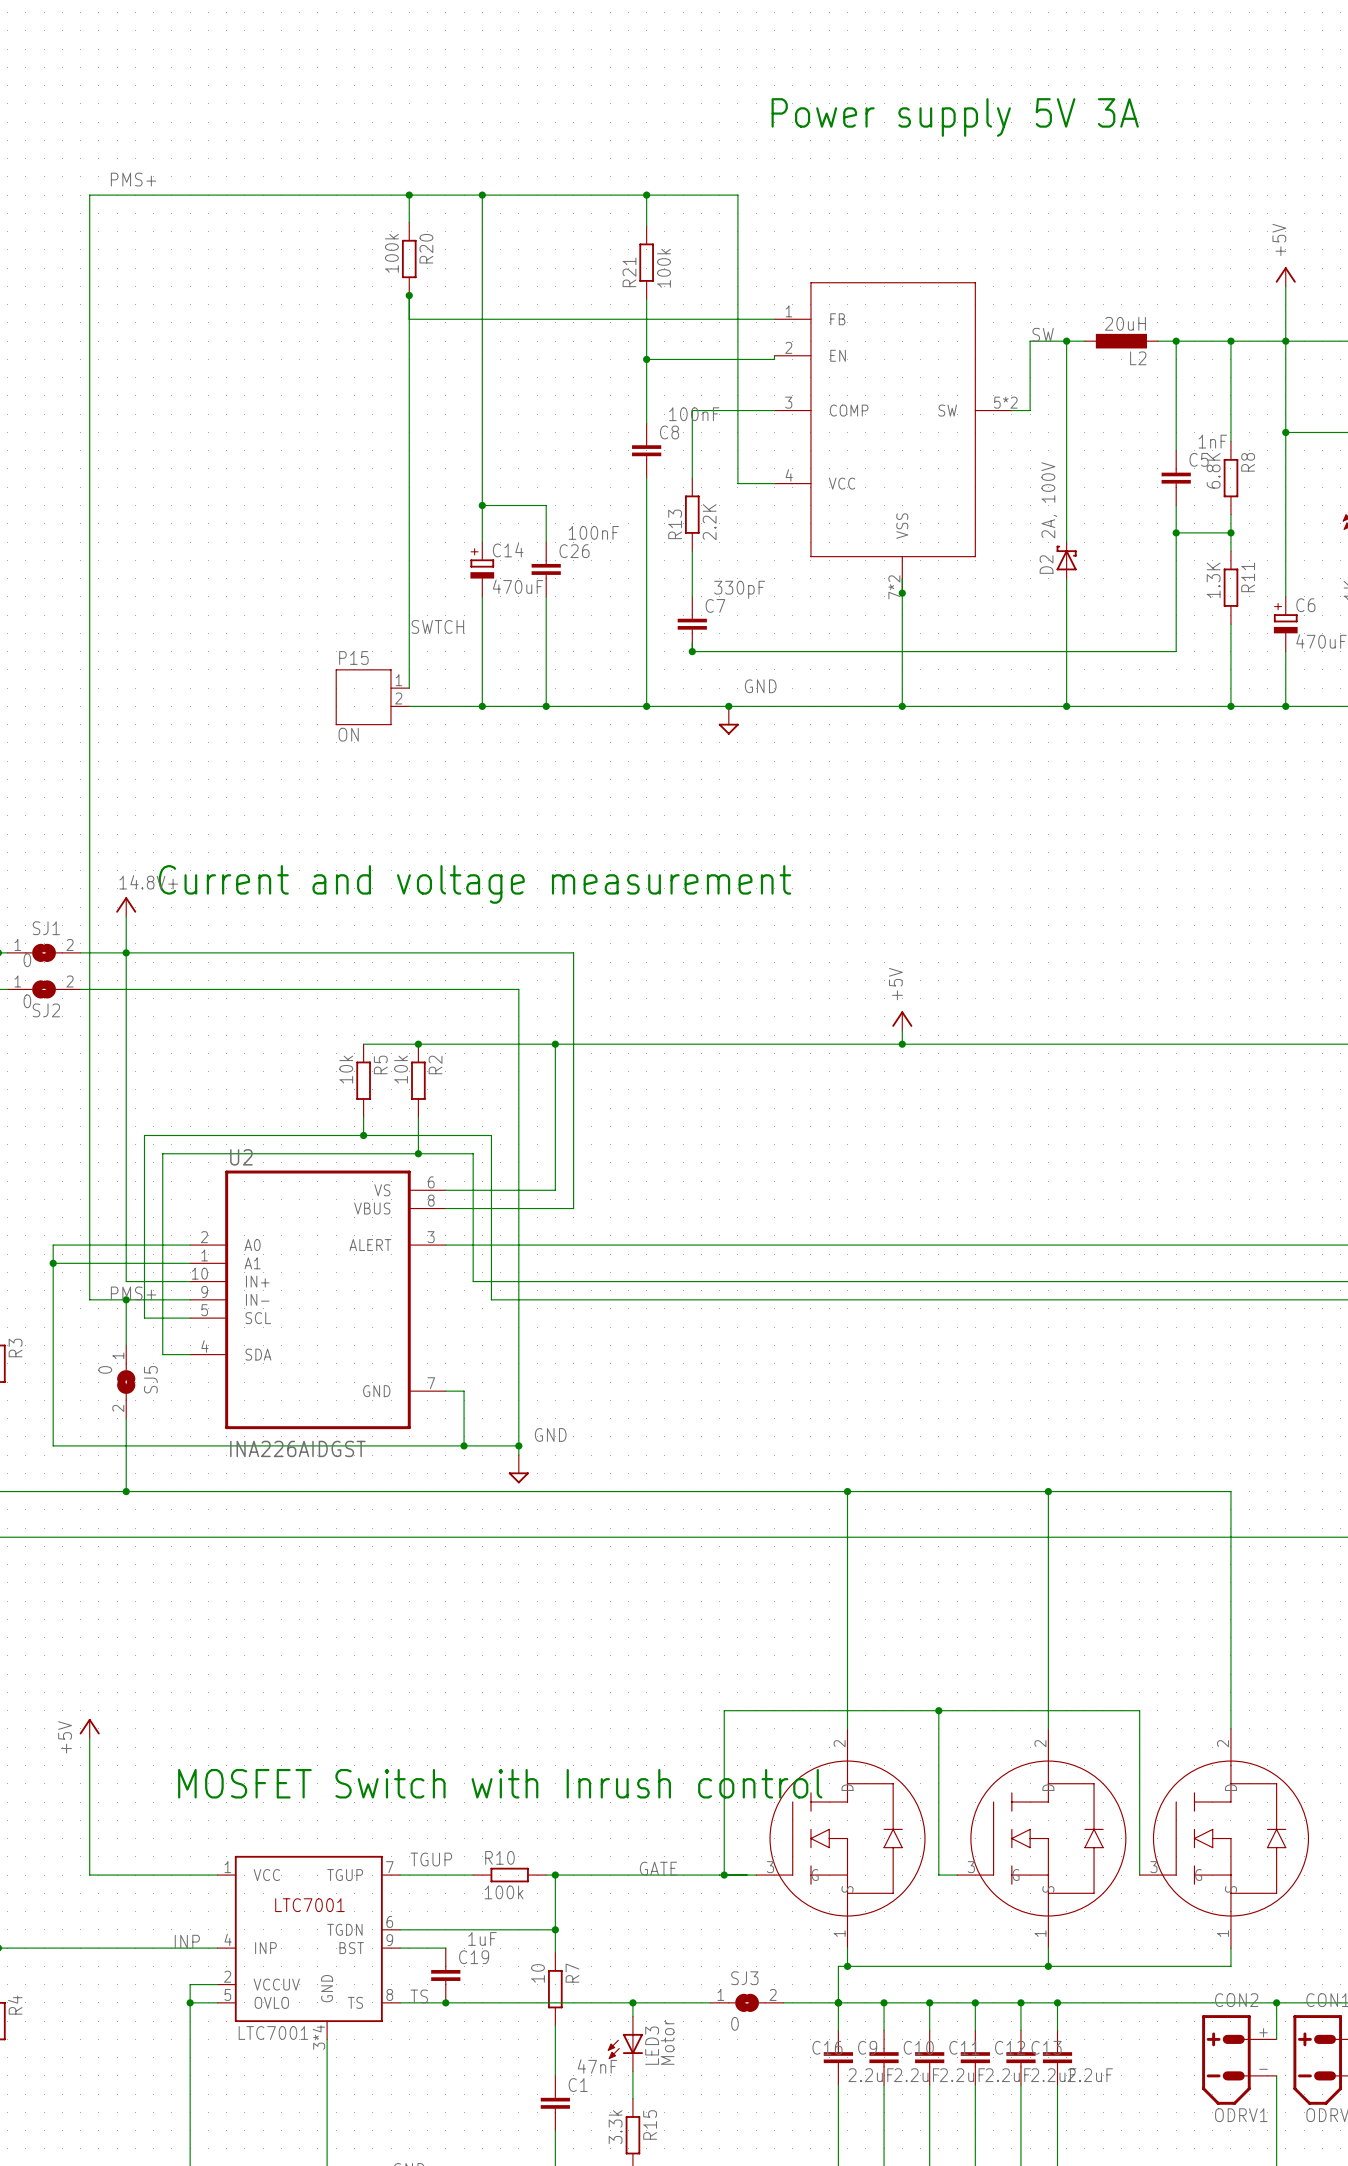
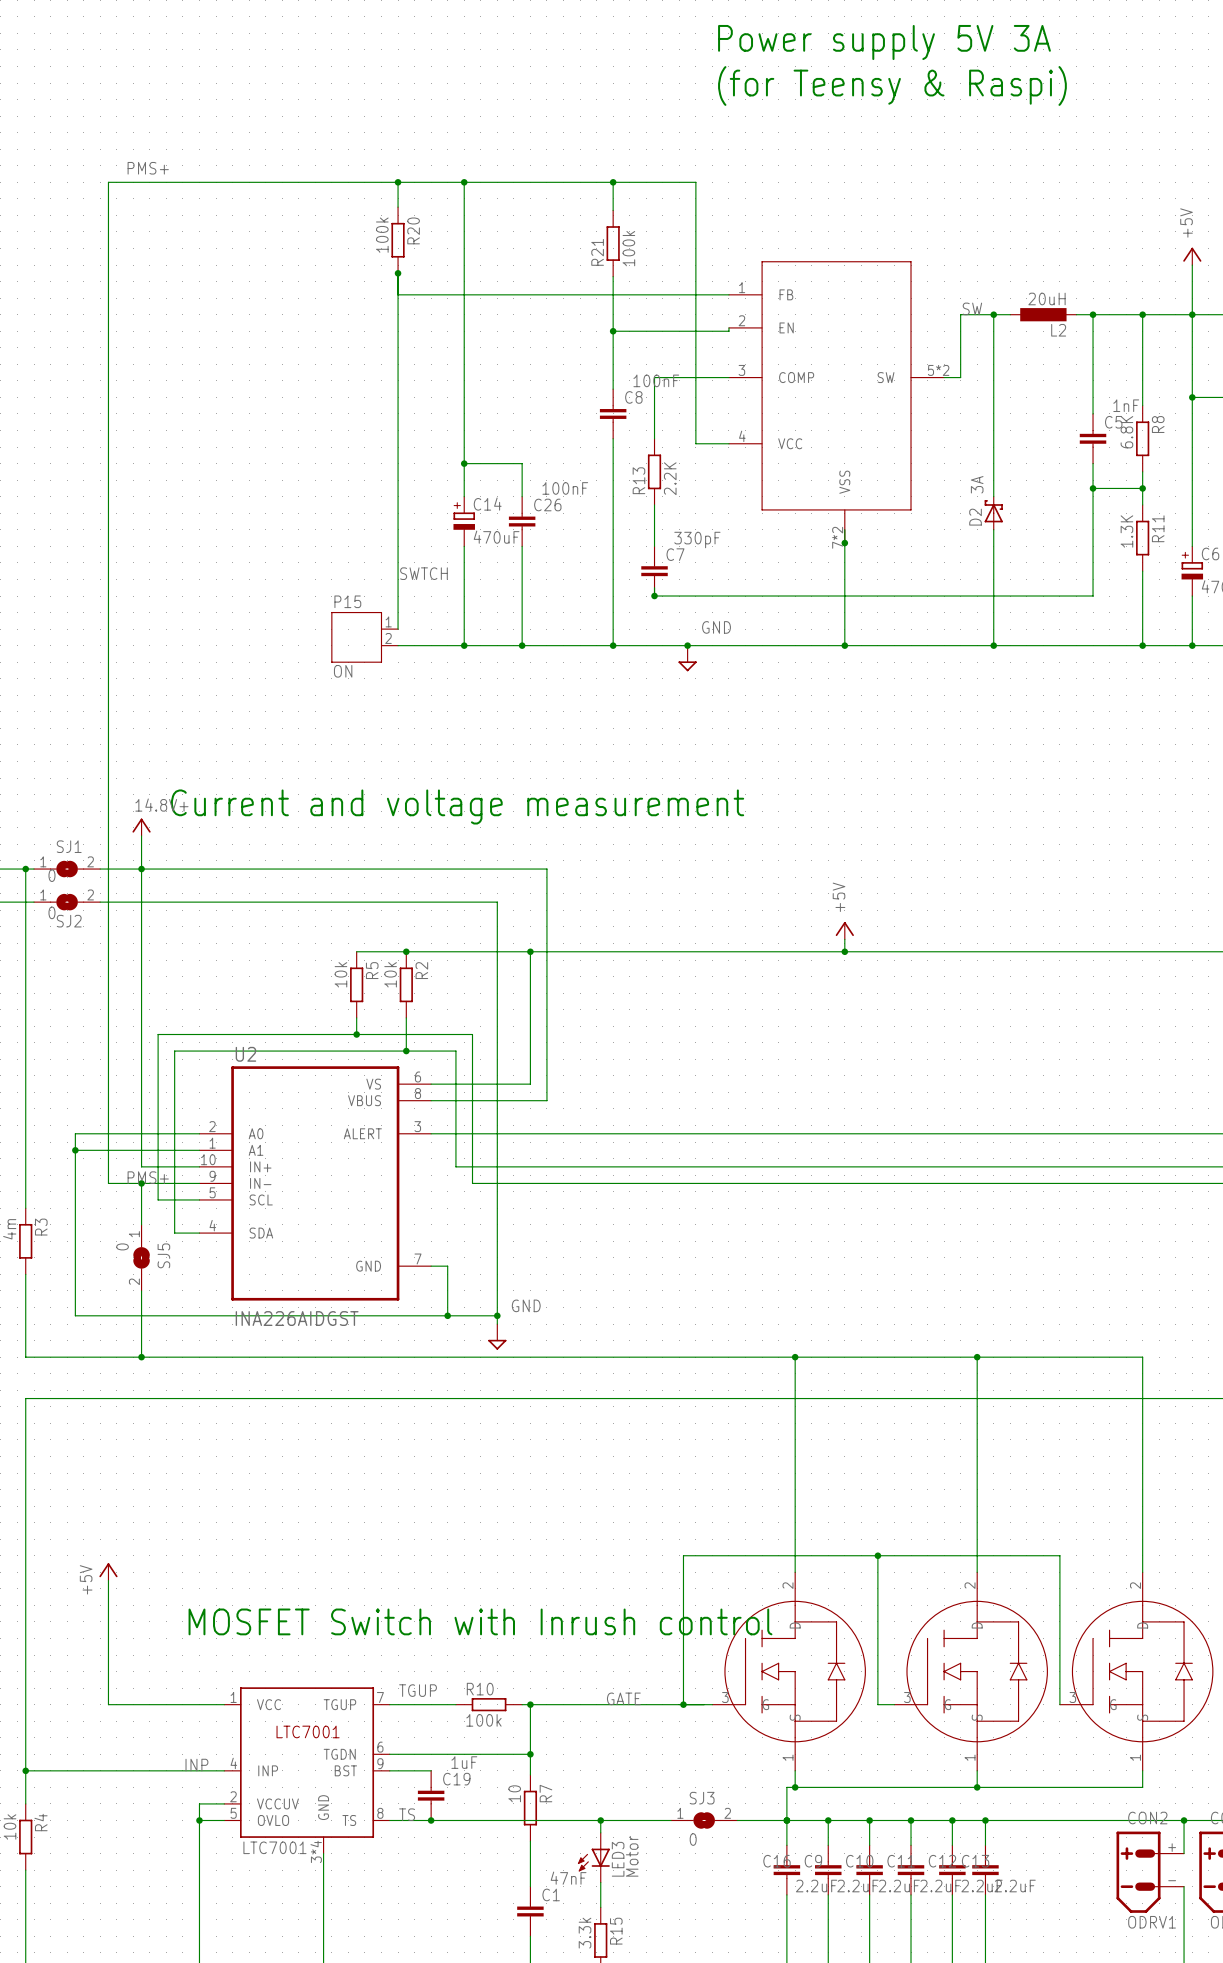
text: none -> (for Teensy & Raspi) (892, 85)
text position: Power supply 5V 3A (955, 117) -> Power supply 5V 3A (884, 42)
D2 value: 2A, 100V (1049, 500) -> 3A (977, 484)

